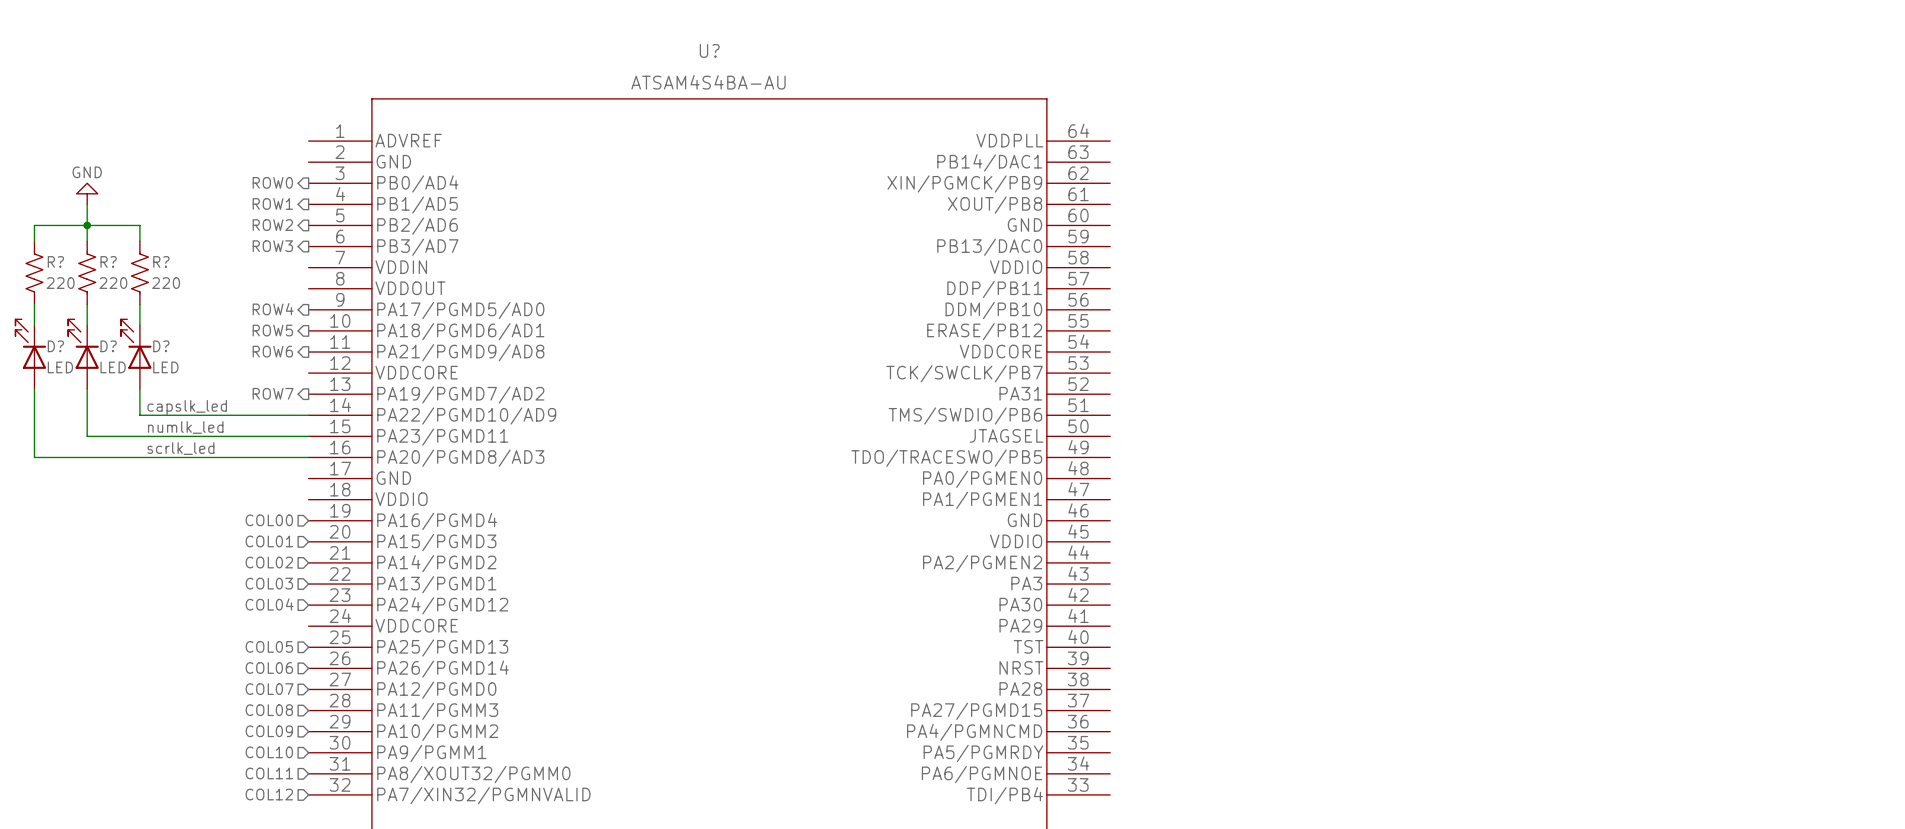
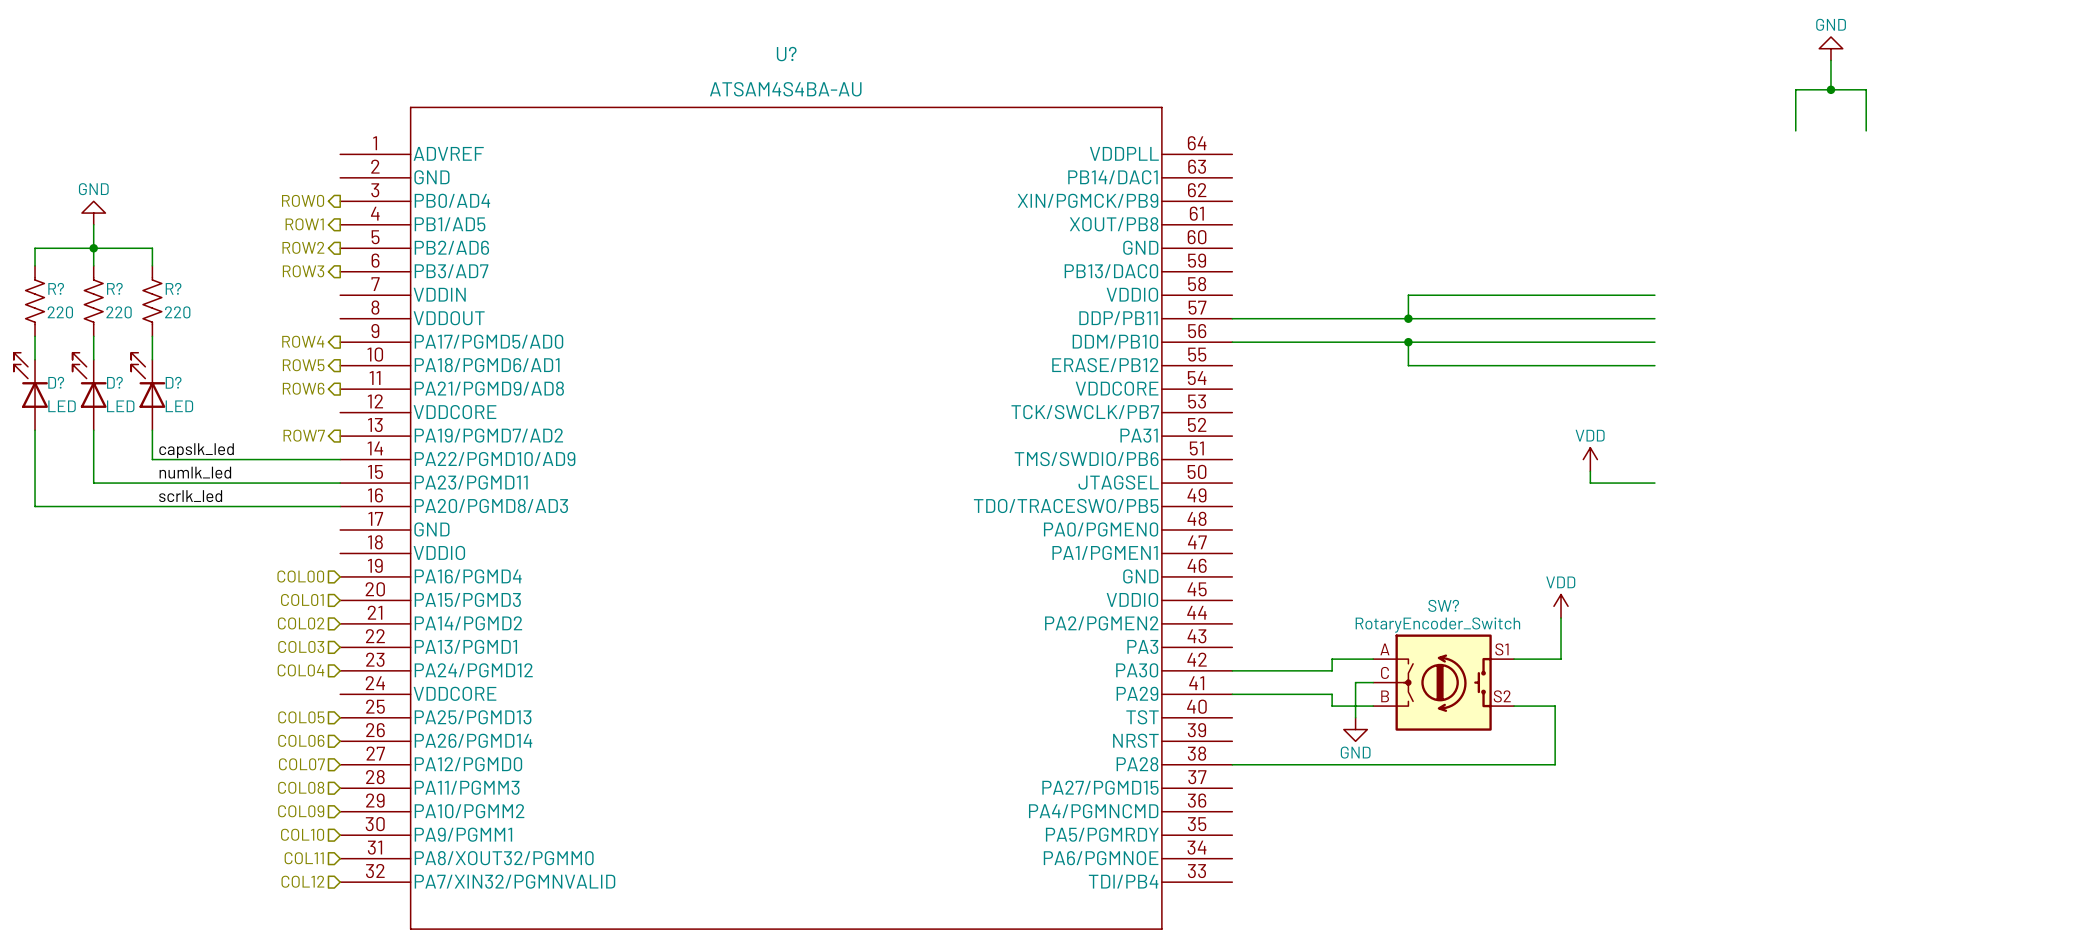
power symbol: none -> GND (1830, 48)
wire: none -> (1830, 60) (1830, 89)
junction: none -> (1830, 89)
wire: none -> (1795, 130) (1795, 89) (1866, 89) (1866, 130)
wire: none -> (1654, 295) (1408, 295) (1408, 318)
wire: none -> (1232, 318) (1654, 318)
junction: none -> (1408, 318)
wire: none -> (1232, 342) (1654, 342)
wire: none -> (1408, 342) (1408, 365) (1654, 365)
junction: none -> (1408, 342)
power symbol: none -> VDD (1590, 459)
wire: none -> (1590, 471) (1590, 483) (1654, 483)
power symbol: none -> VDD (1561, 606)
wire: none -> (1561, 618) (1561, 659) (1514, 659)
wire: none -> (1373, 659) (1332, 659) (1332, 670) (1232, 670)
wire: none -> (1373, 682) (1355, 682) (1355, 717)
SW?: none -> RotaryEncoder_Switch (1443, 682)
wire: none -> (1232, 694) (1332, 694) (1332, 706) (1373, 706)
wire: none -> (1514, 706) (1555, 706) (1555, 764) (1232, 764)
power symbol: none -> GND (1355, 729)

